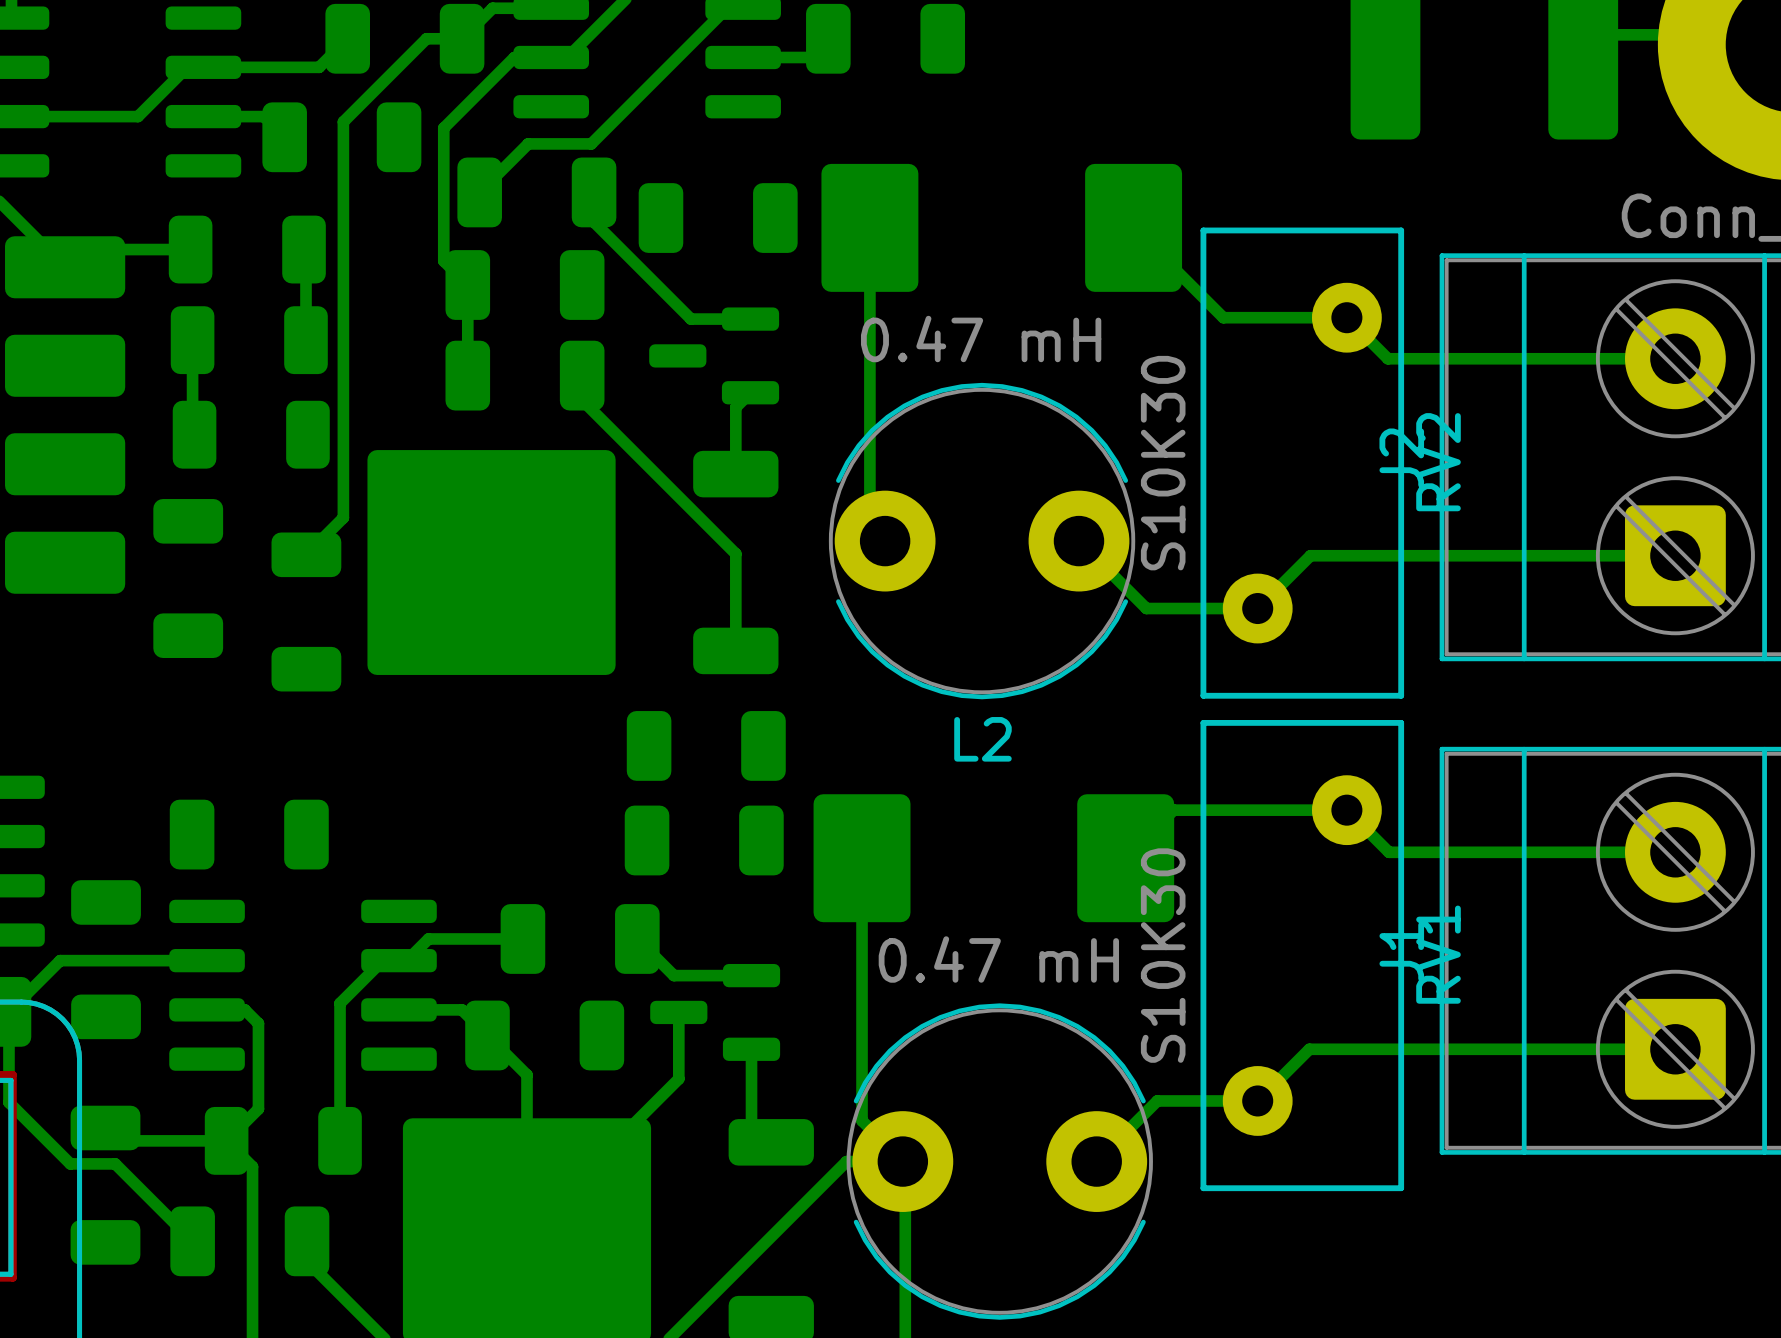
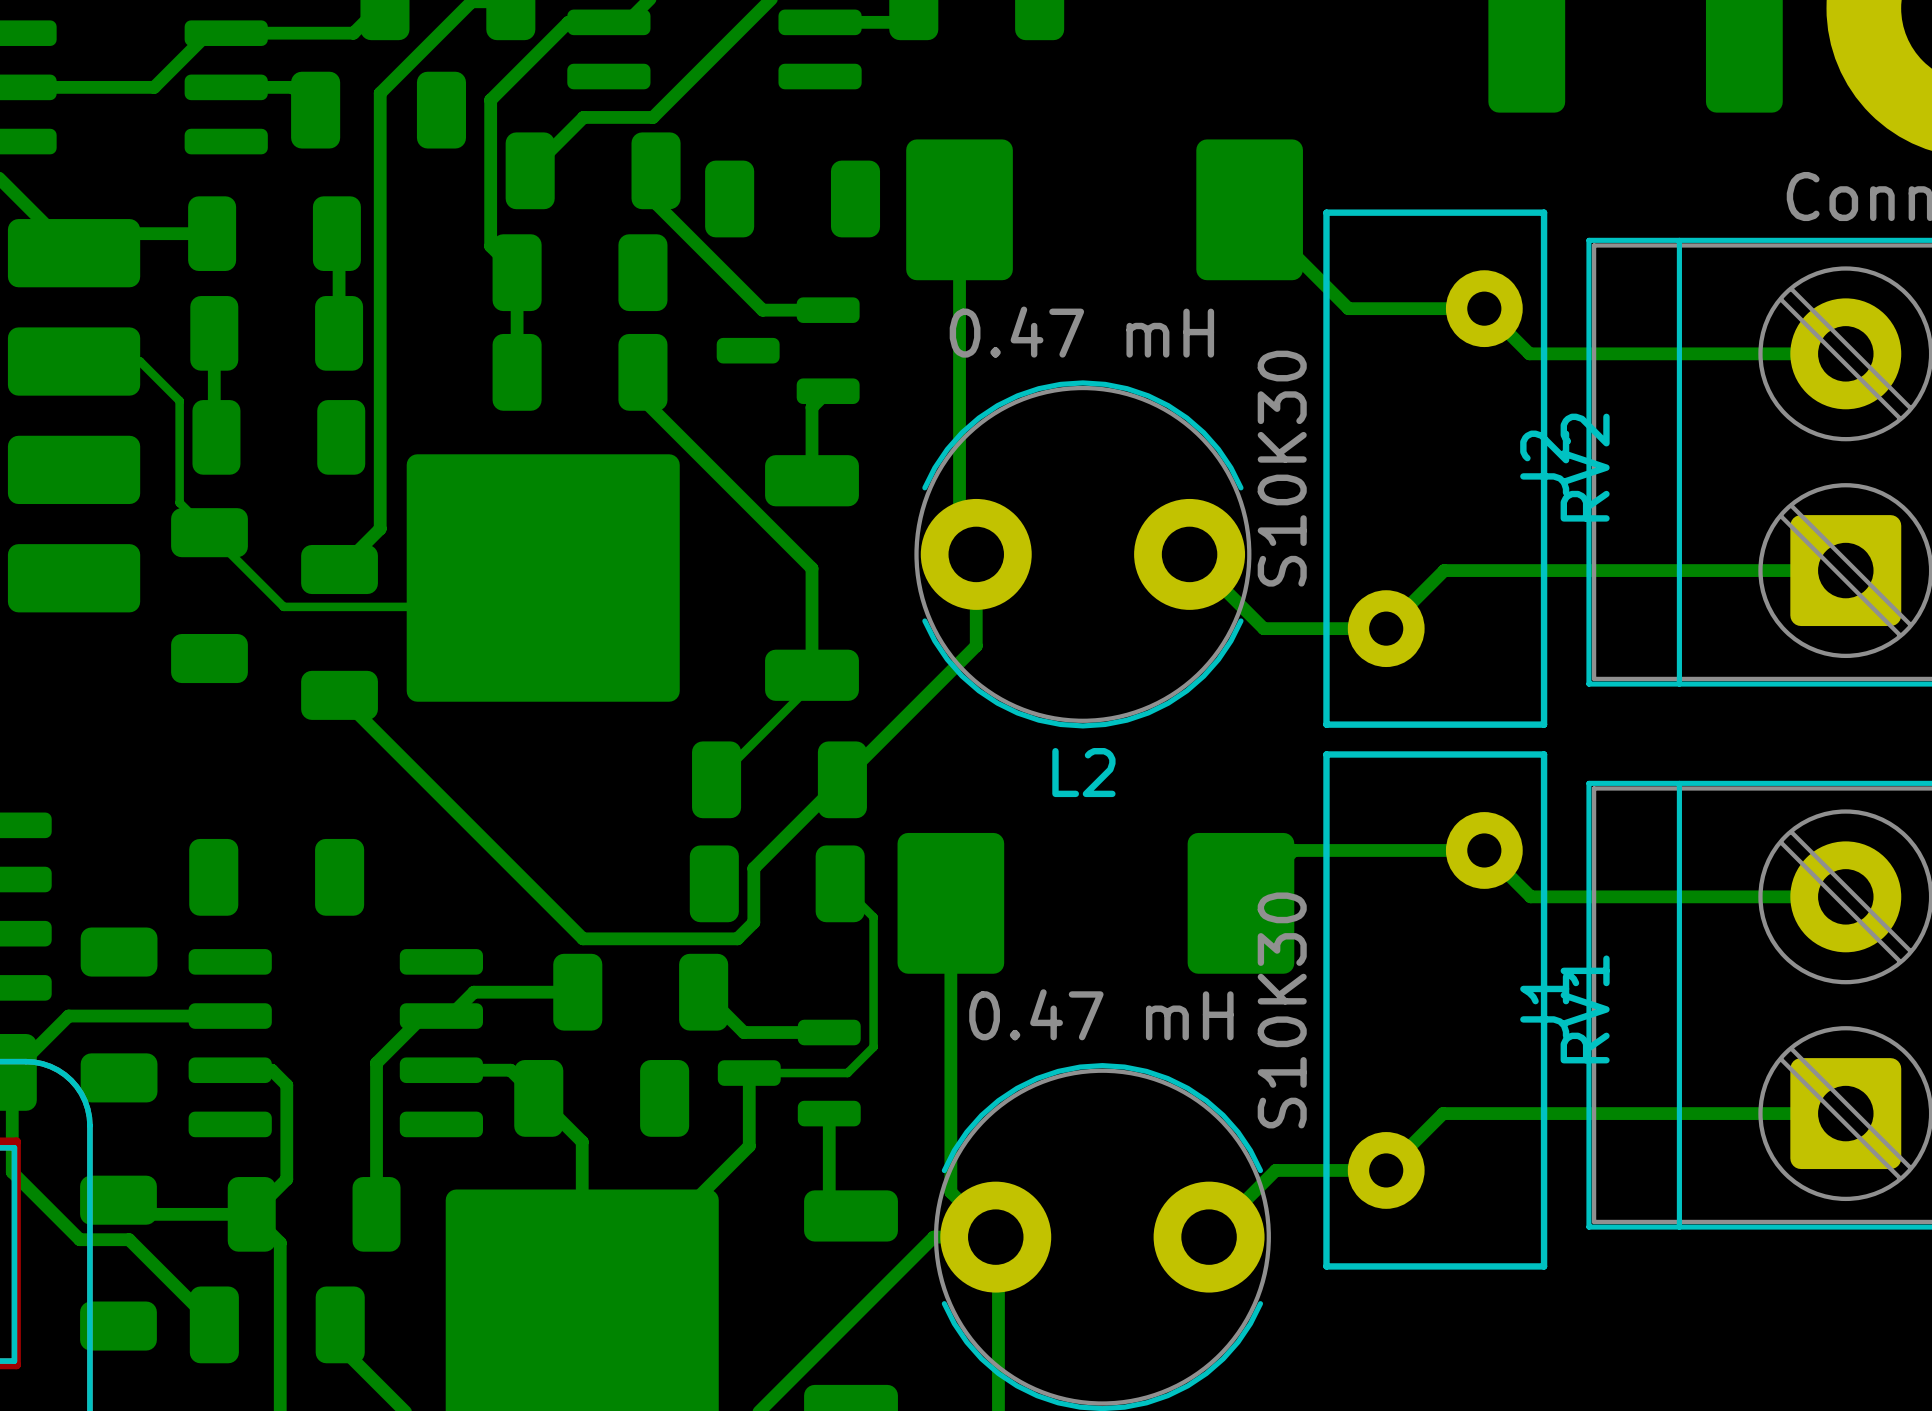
bottom track: none -> (74, 361) (140, 361) (179, 400) (179, 502) (283, 606) (514, 606) (543, 578)
bottom track: none -> (976, 554) (976, 645) (753, 868) (753, 922) (737, 938) (583, 938) (339, 695)
bottom track: none -> (812, 675) (812, 684) (716, 779)
bottom track: none -> (840, 883) (873, 917) (873, 1047) (847, 1073) (749, 1073)

